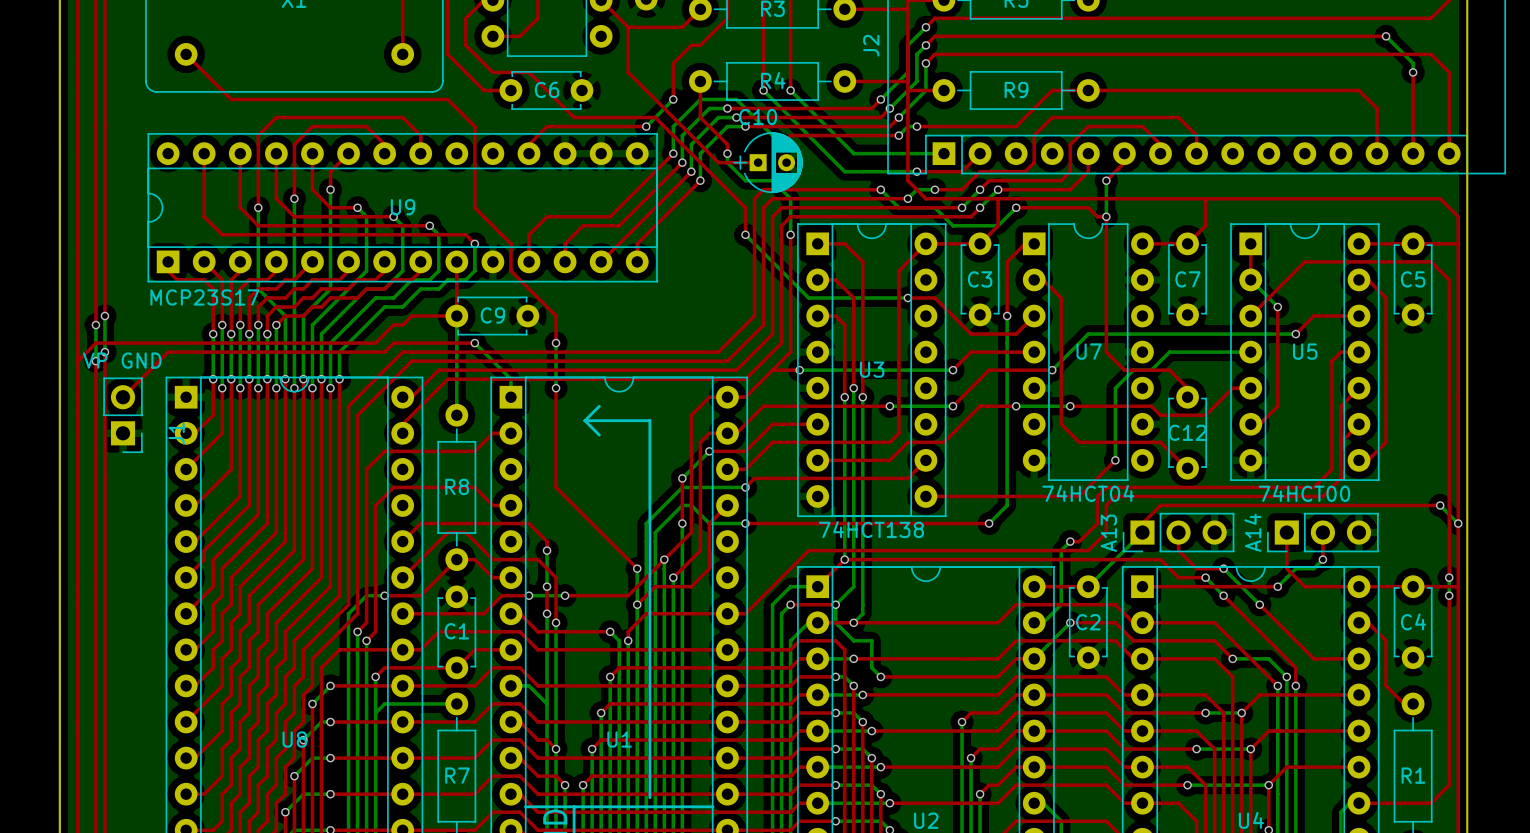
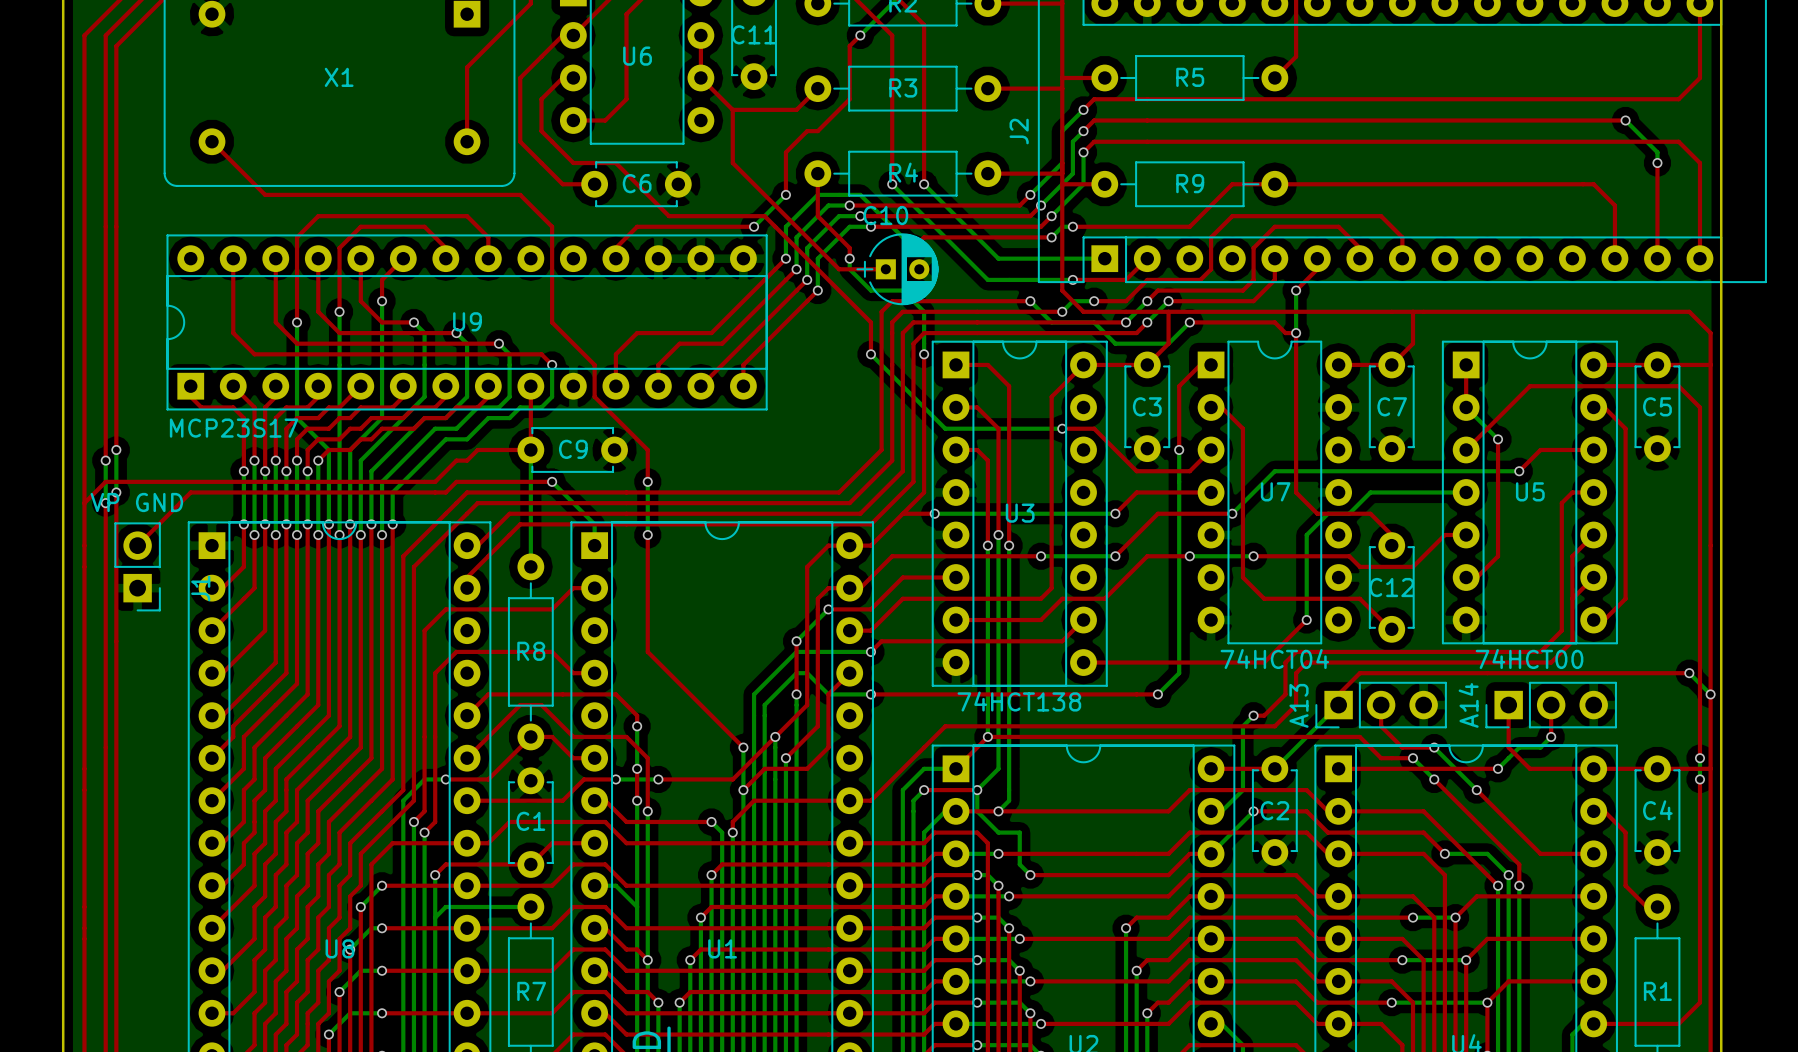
line: (599, 406) (584, 420) -> none
line: (584, 420) (599, 435) -> none
line: (584, 420) (649, 420) (649, 797) -> none
line: (525, 806) (713, 806) -> none

